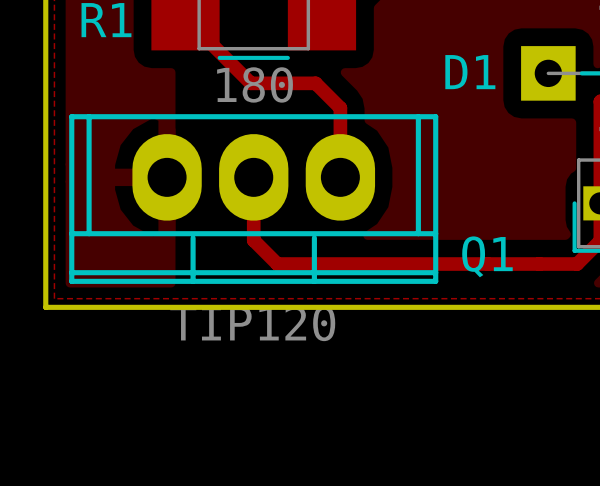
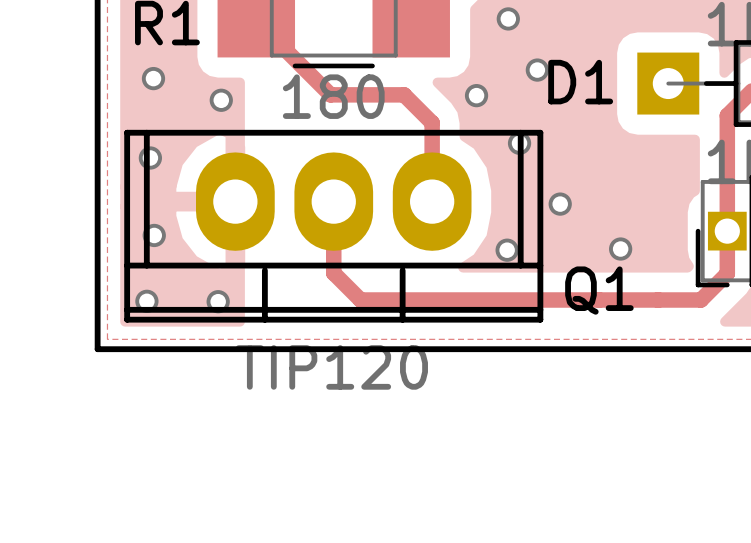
via: none -> (508, 18)
via: none -> (537, 70)
via: none -> (153, 78)
via: none -> (476, 95)
via: none -> (221, 100)
via: none -> (519, 143)
via: none -> (150, 158)
via: none -> (560, 204)
via: none -> (154, 235)
via: none -> (620, 249)
via: none -> (507, 250)
via: none -> (146, 301)
via: none -> (218, 301)

